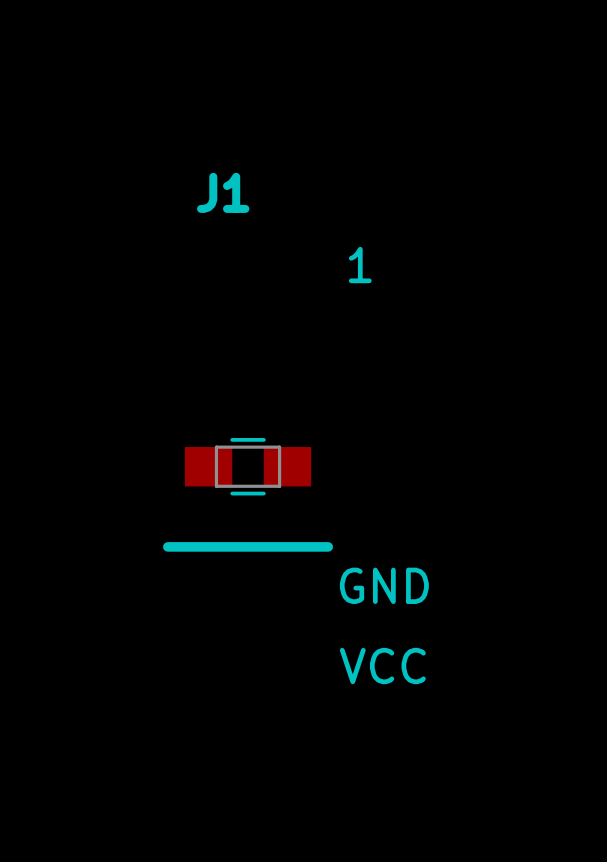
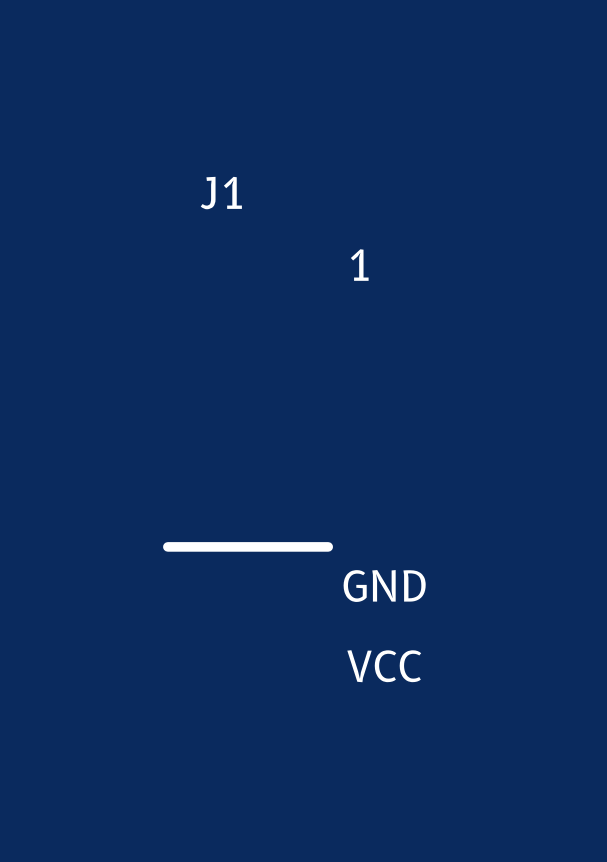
J1 footprint: [163, 437, 334, 552] -> [163, 542, 334, 552]

